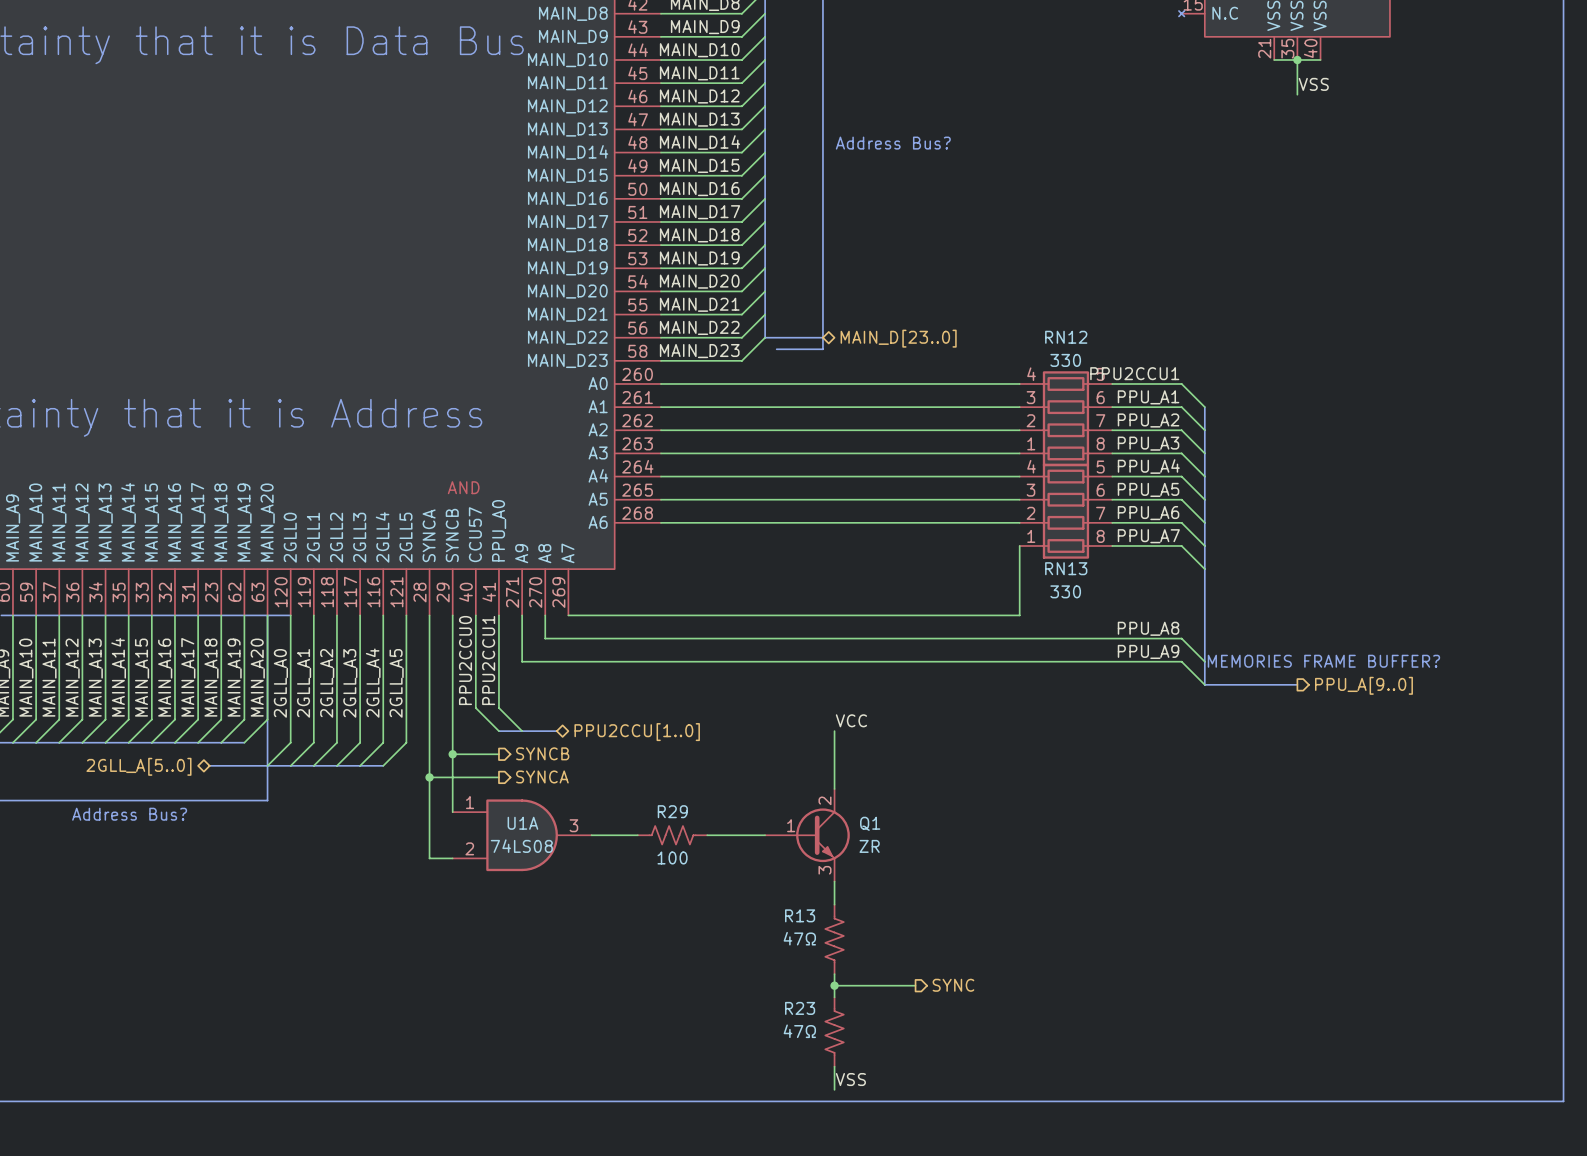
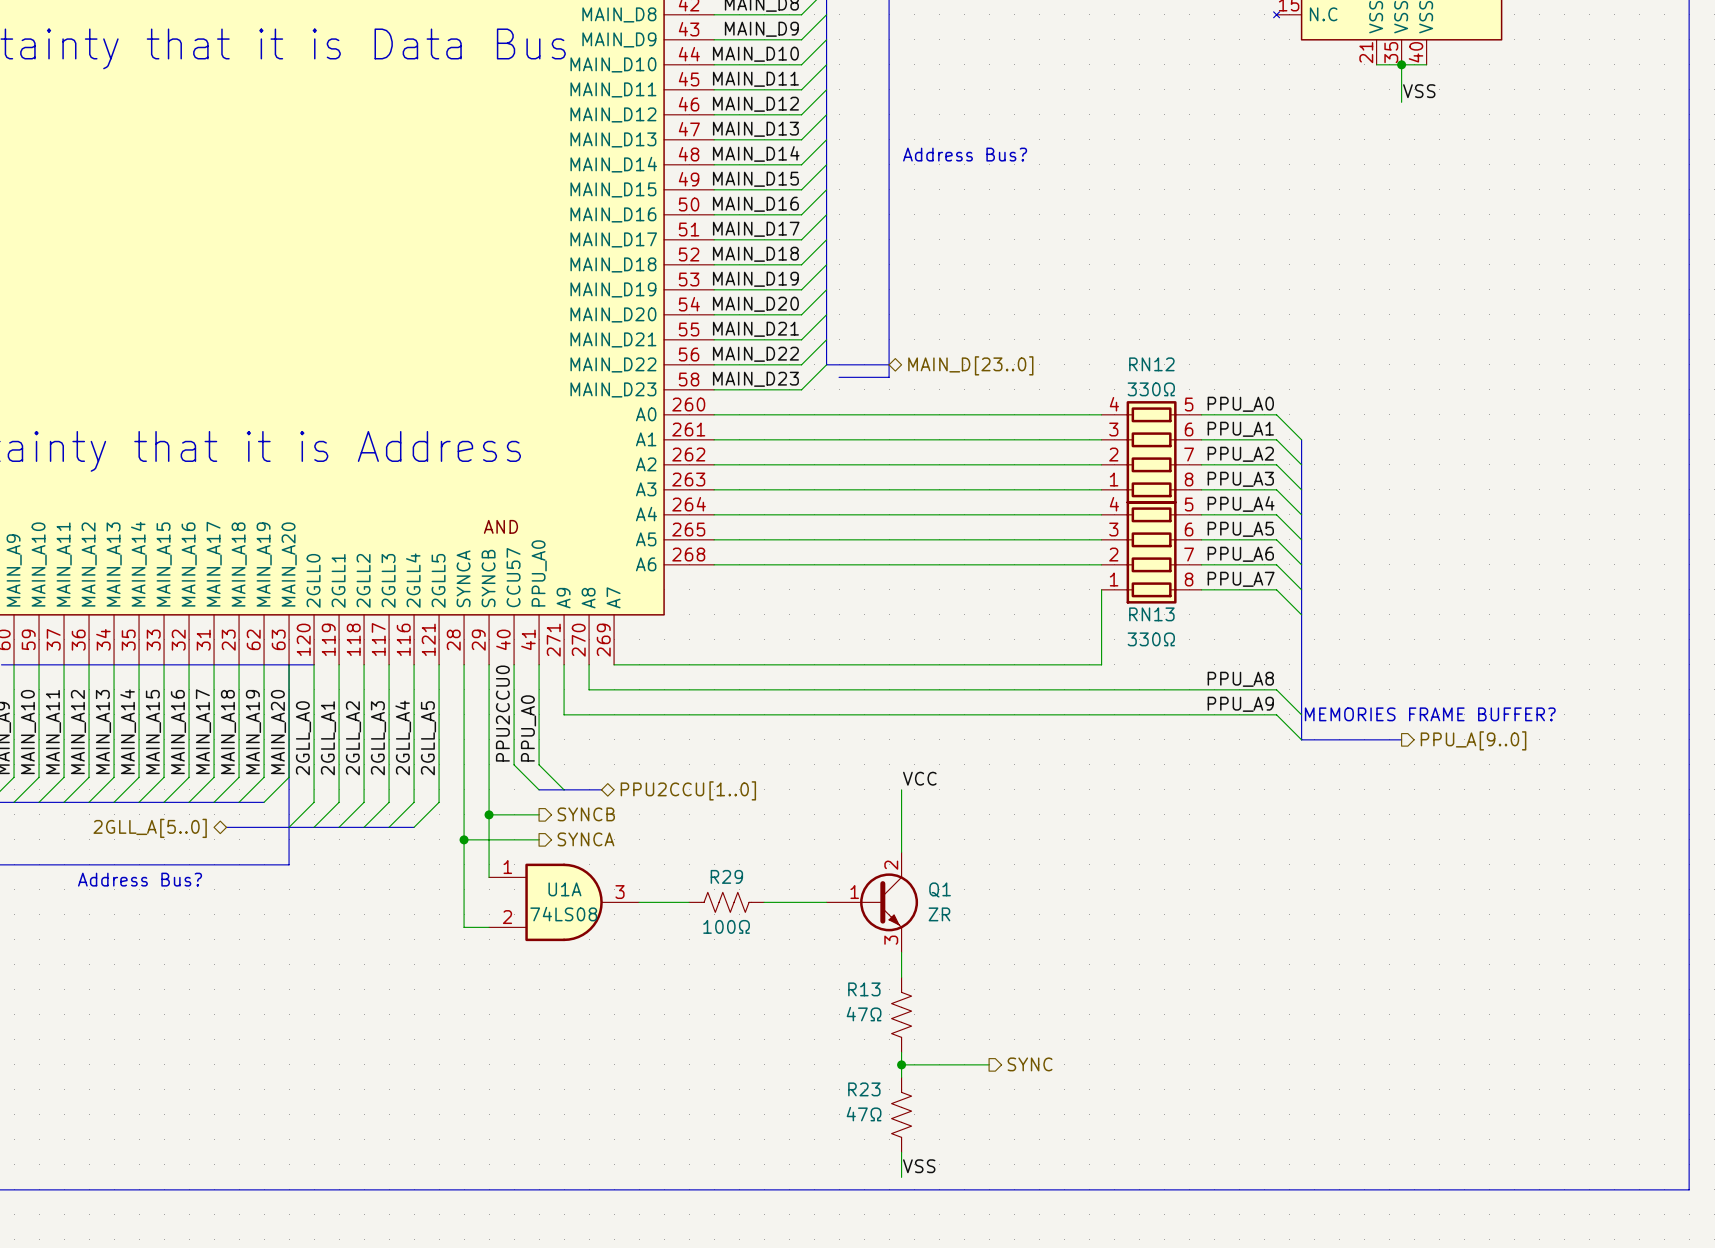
RN12 value: 330 (1065, 360) -> 330Ω (1151, 389)
label: PPU2CCU1 (1134, 373) -> PPU_A0 (1240, 404)
RN13 value: 330 (1065, 591) -> 330Ω (1151, 639)
label: PPU2CCU1 (488, 660) -> PPU_A0 (528, 728)
R29 value: 100 (672, 857) -> 100Ω (726, 926)

